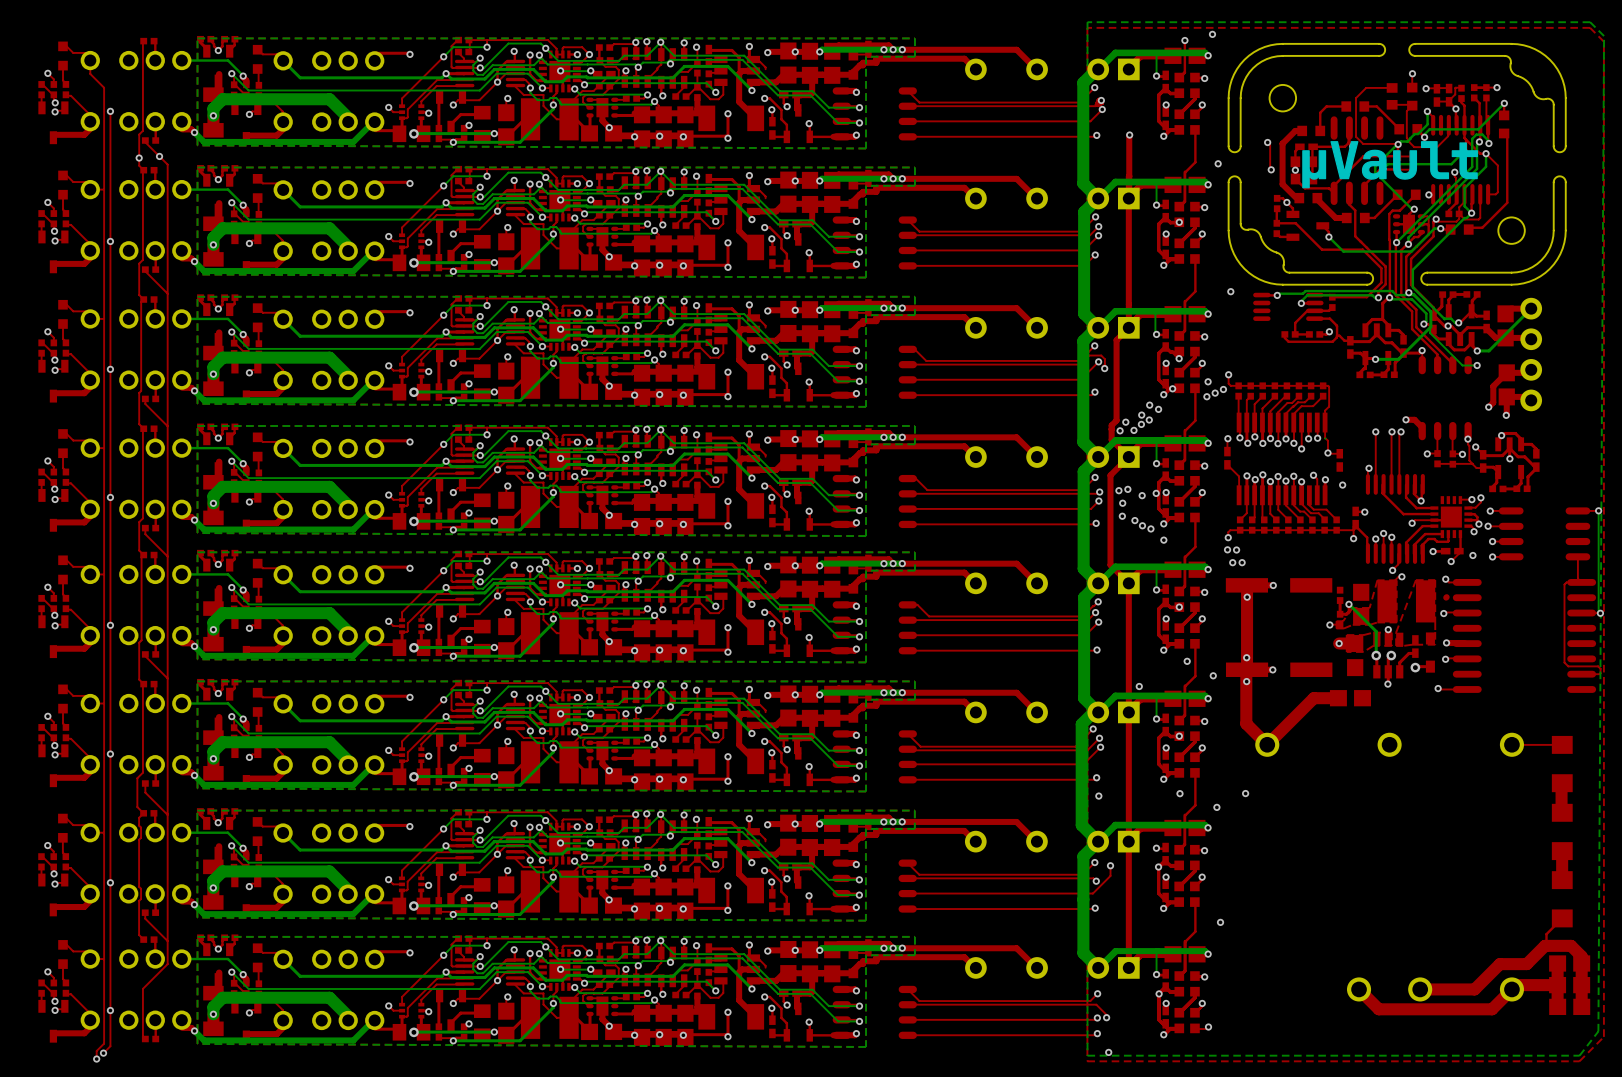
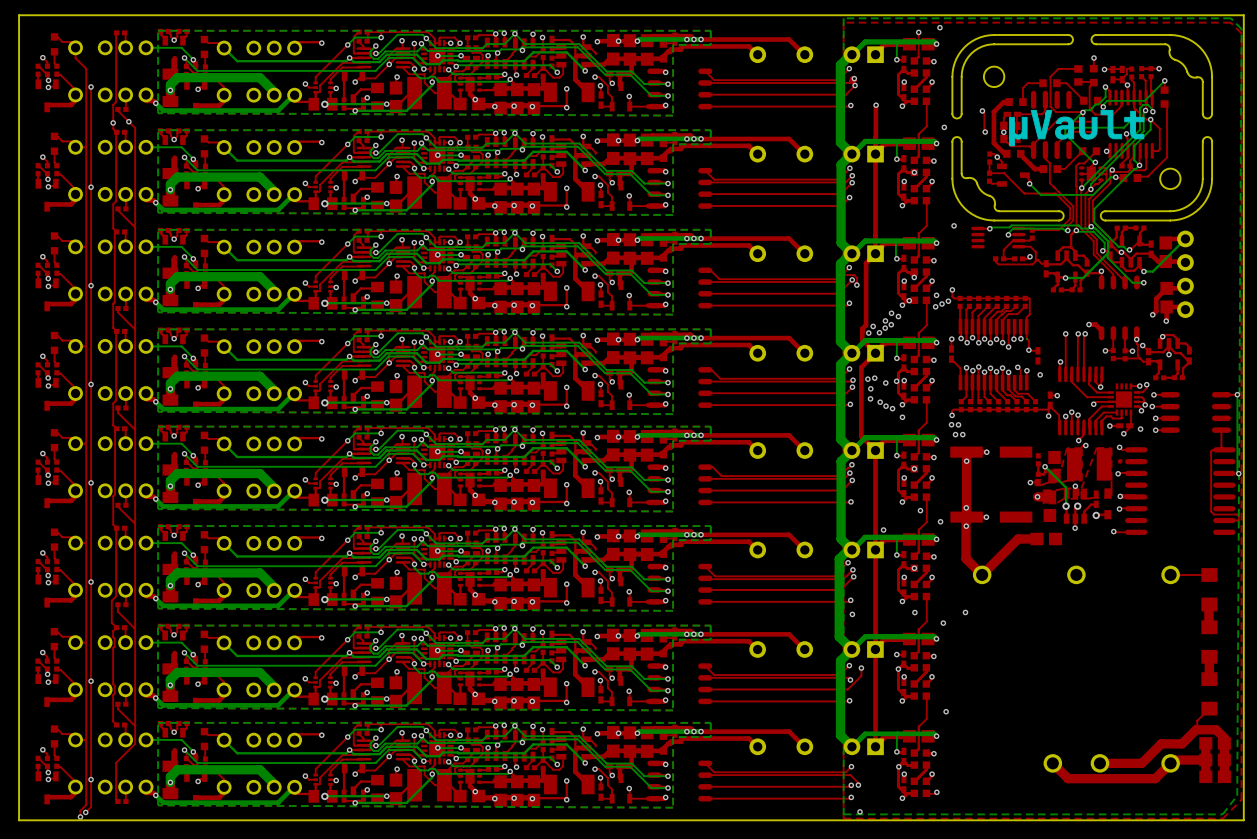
board edge: none -> (1243, 15) (19, 15) (19, 820) (1243, 820) (1243, 15)

